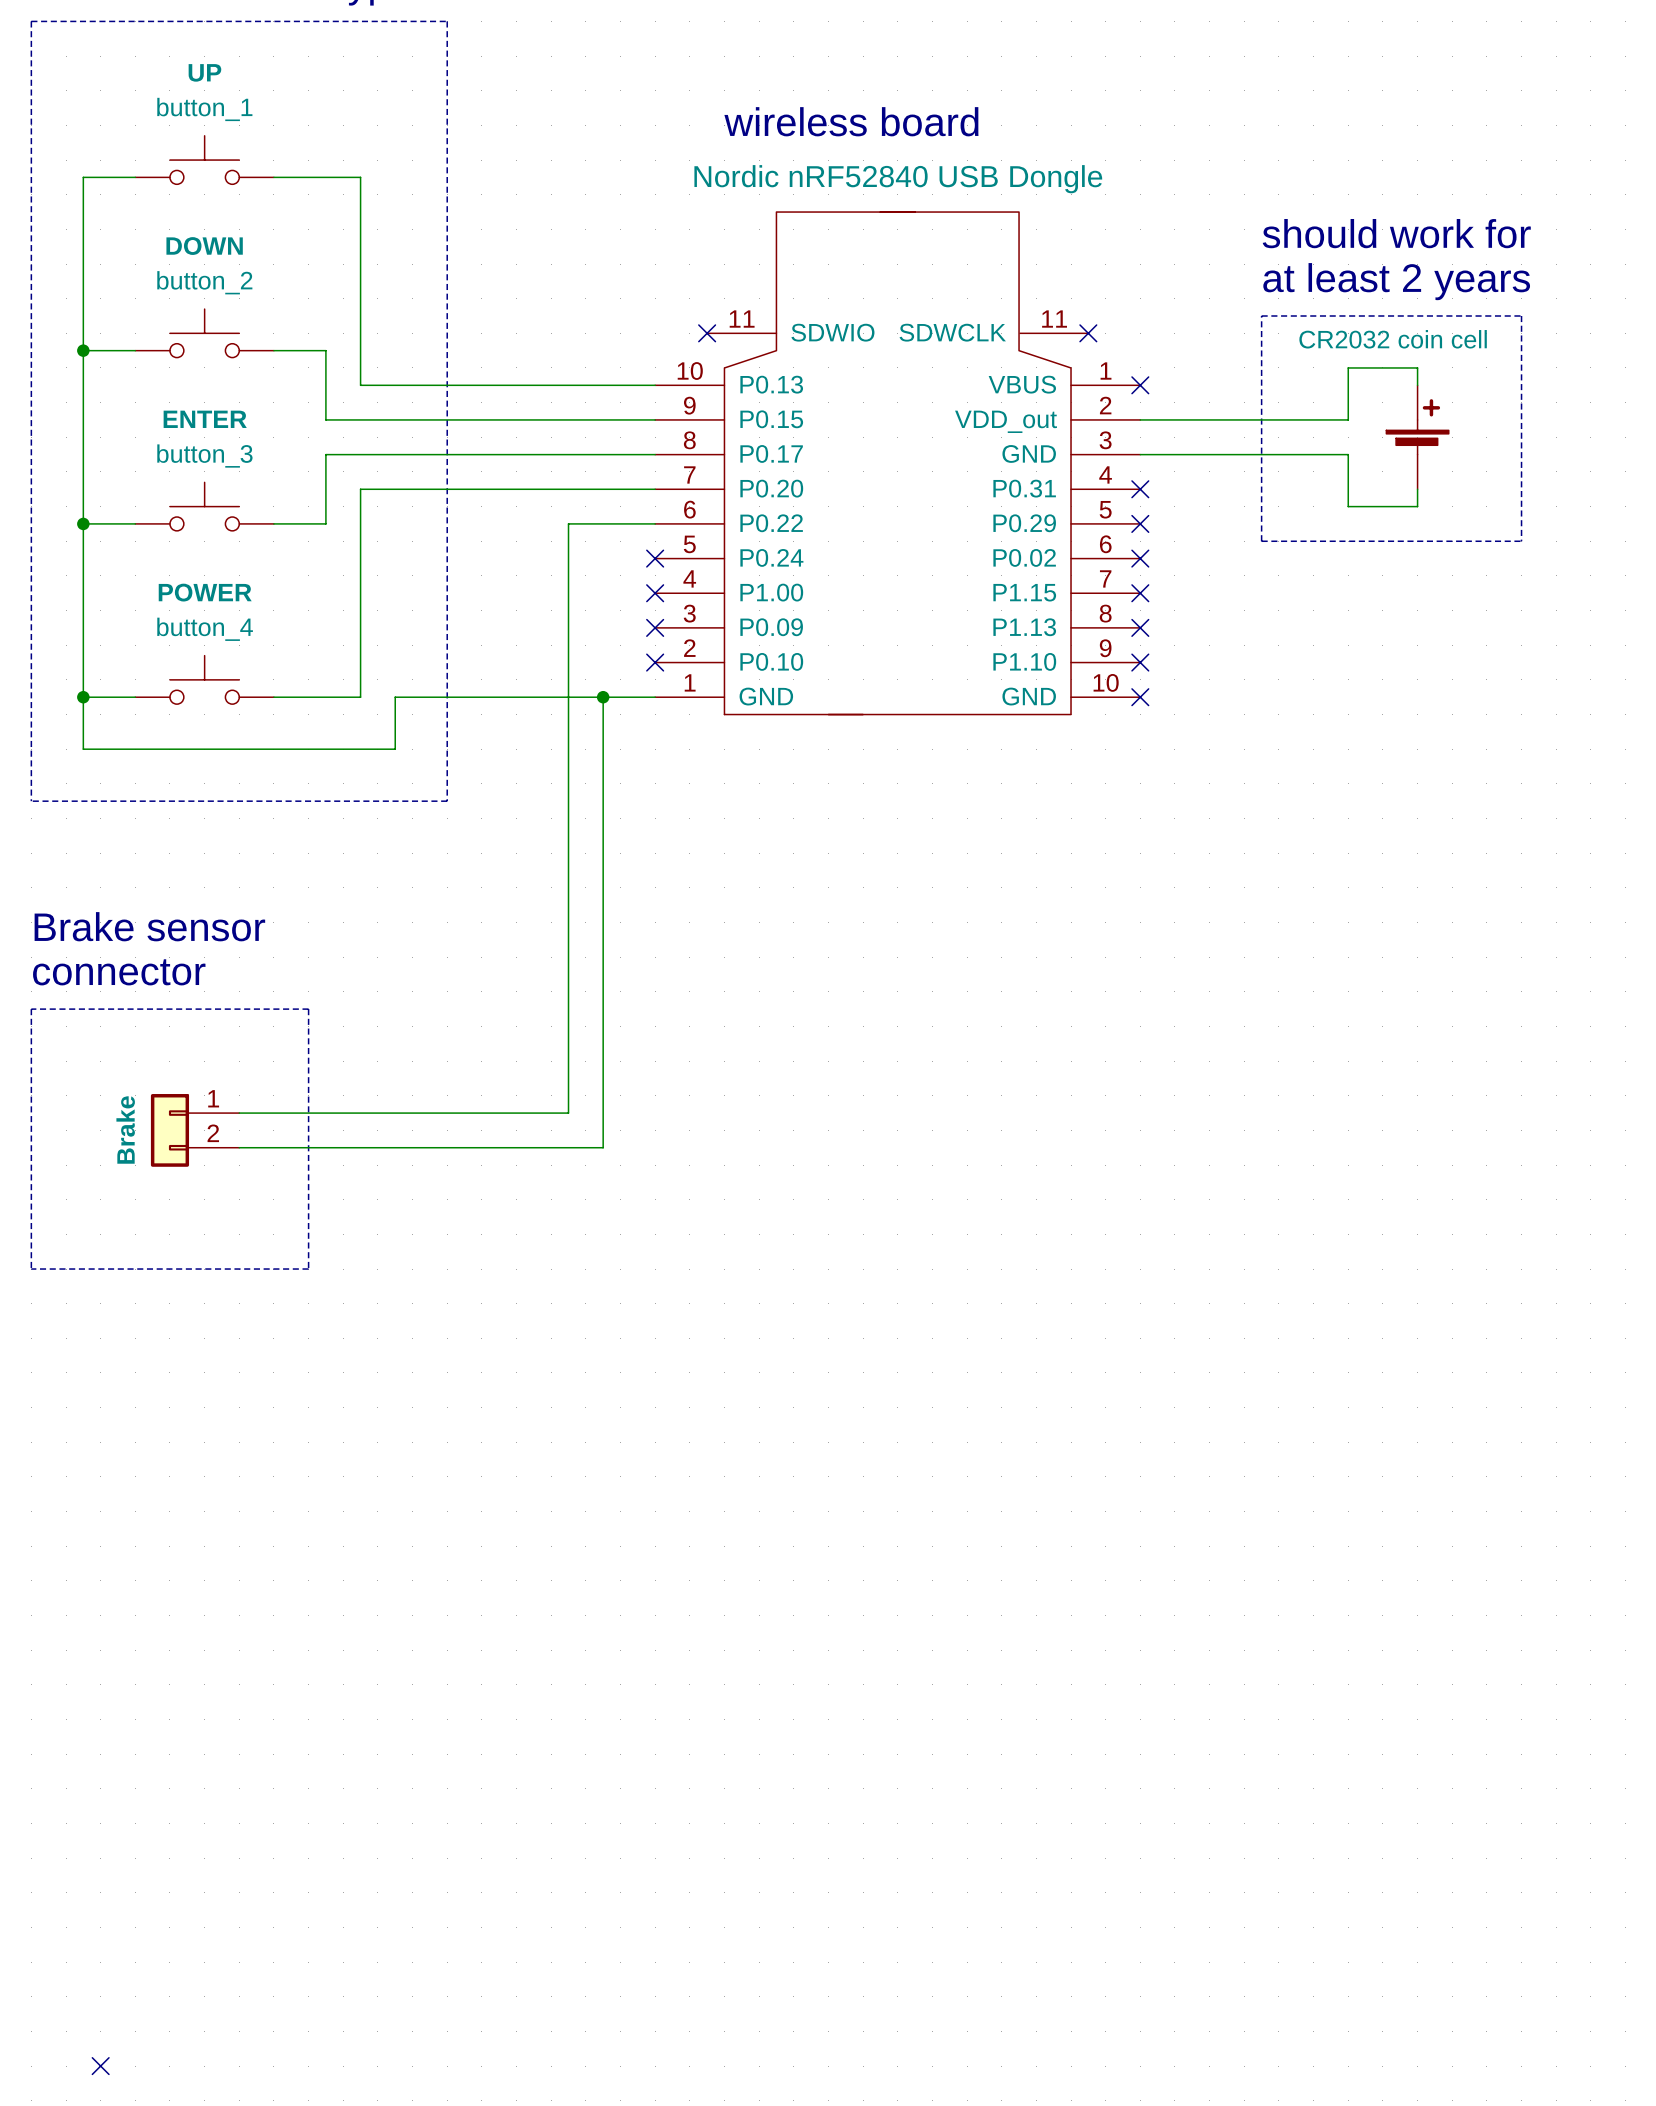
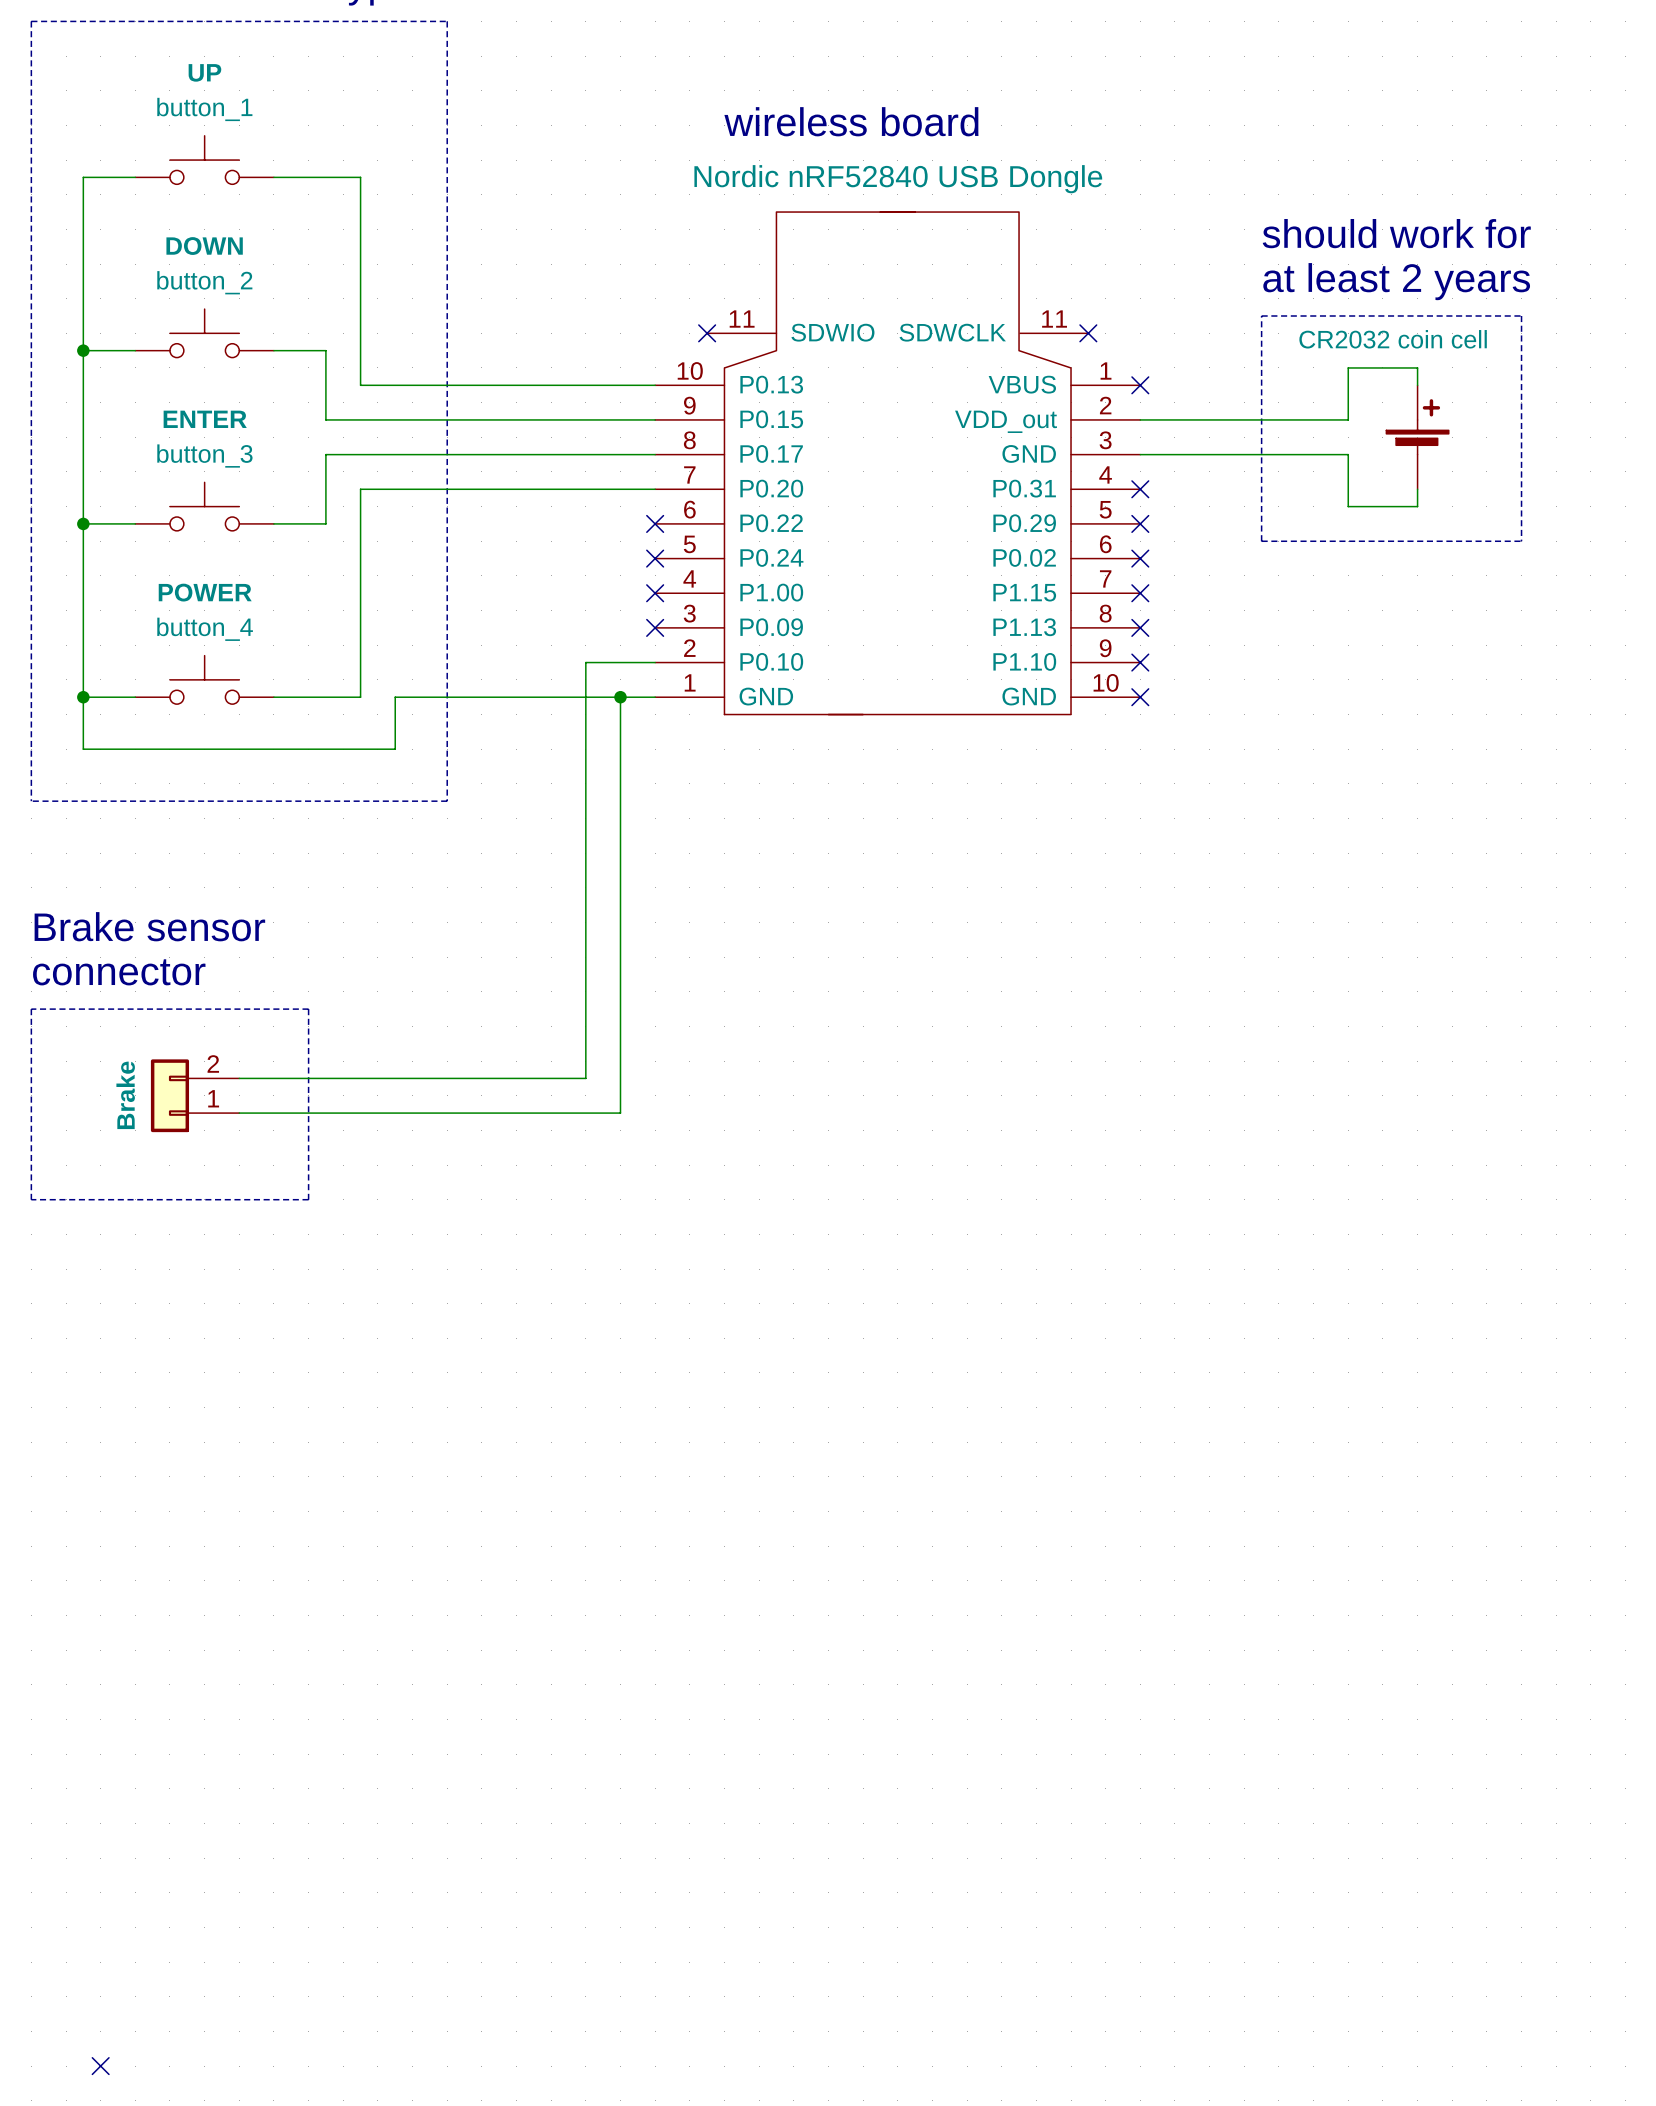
wire: (655, 523) (568, 523) (568, 1113) -> (620, 697) (620, 1113) (568, 1113)
no-connect mark: none -> (655, 523)
wire: none -> (655, 662) (585, 662) (585, 1078) (239, 1078)
no-connect mark: (655, 662) -> none
wire: (603, 697) (603, 1147) (239, 1147) -> none
junction position: (603, 697) -> (620, 697)
part: none -> Brake (195, 1095)
part: Brake (195, 1130) -> none
line: (31, 1199) (31, 1269) (308, 1269) (308, 1199) -> (31, 1199) (308, 1199)

